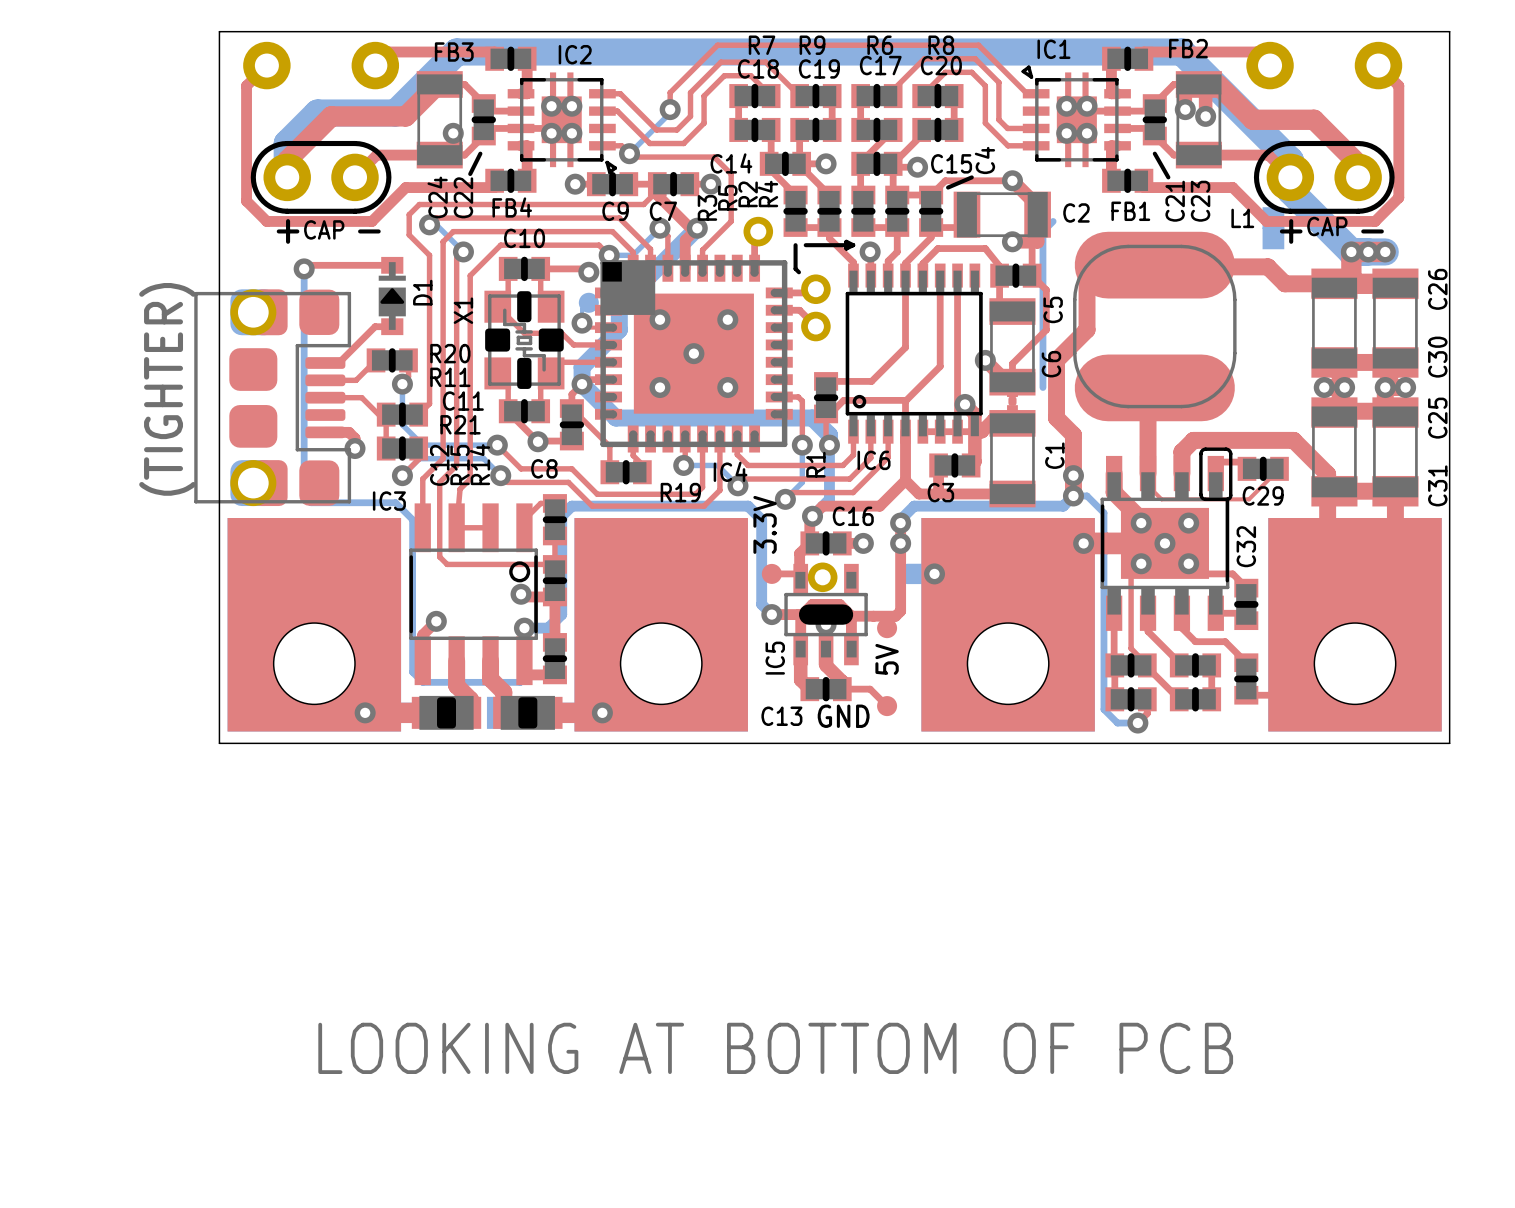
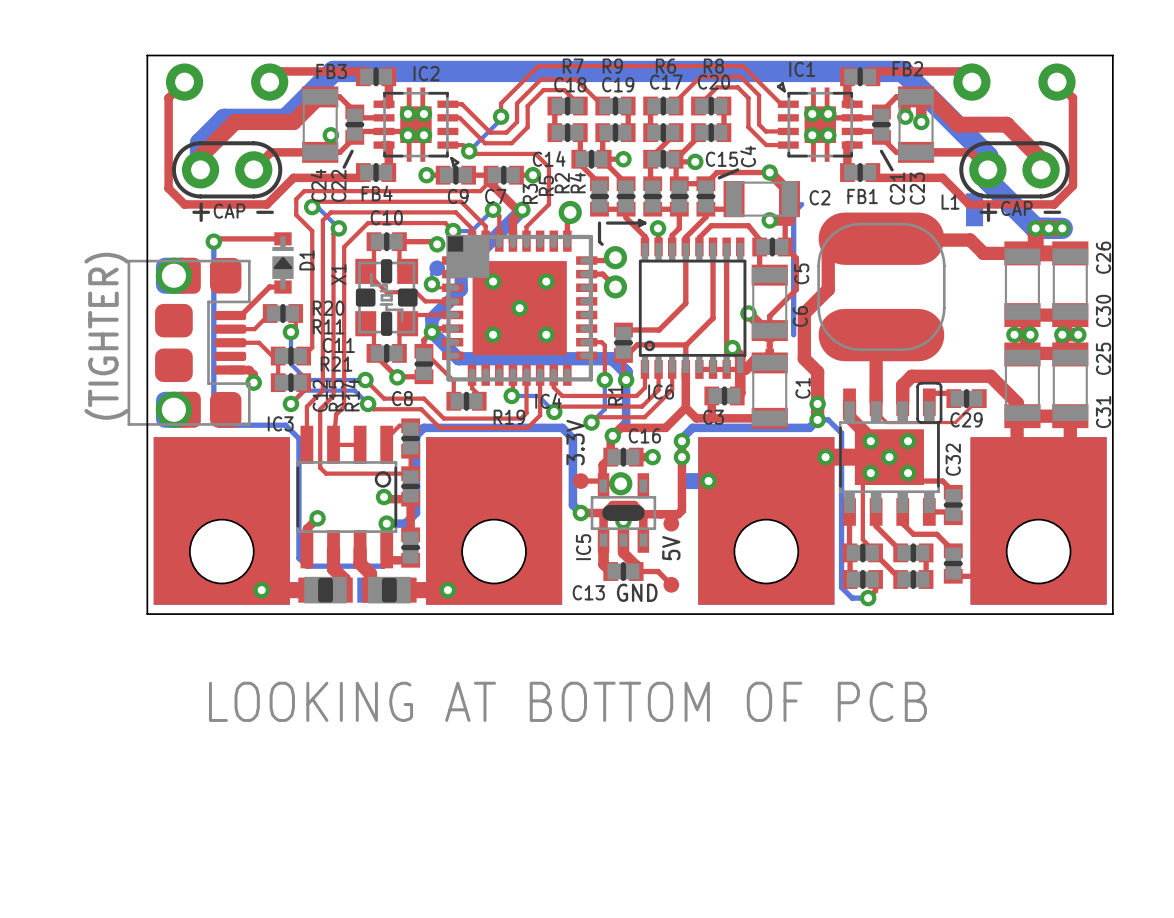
text position: LOOKING AT BOTTOM OF PCB (775, 1048) -> LOOKING AT BOTTOM OF PCB (567, 701)

